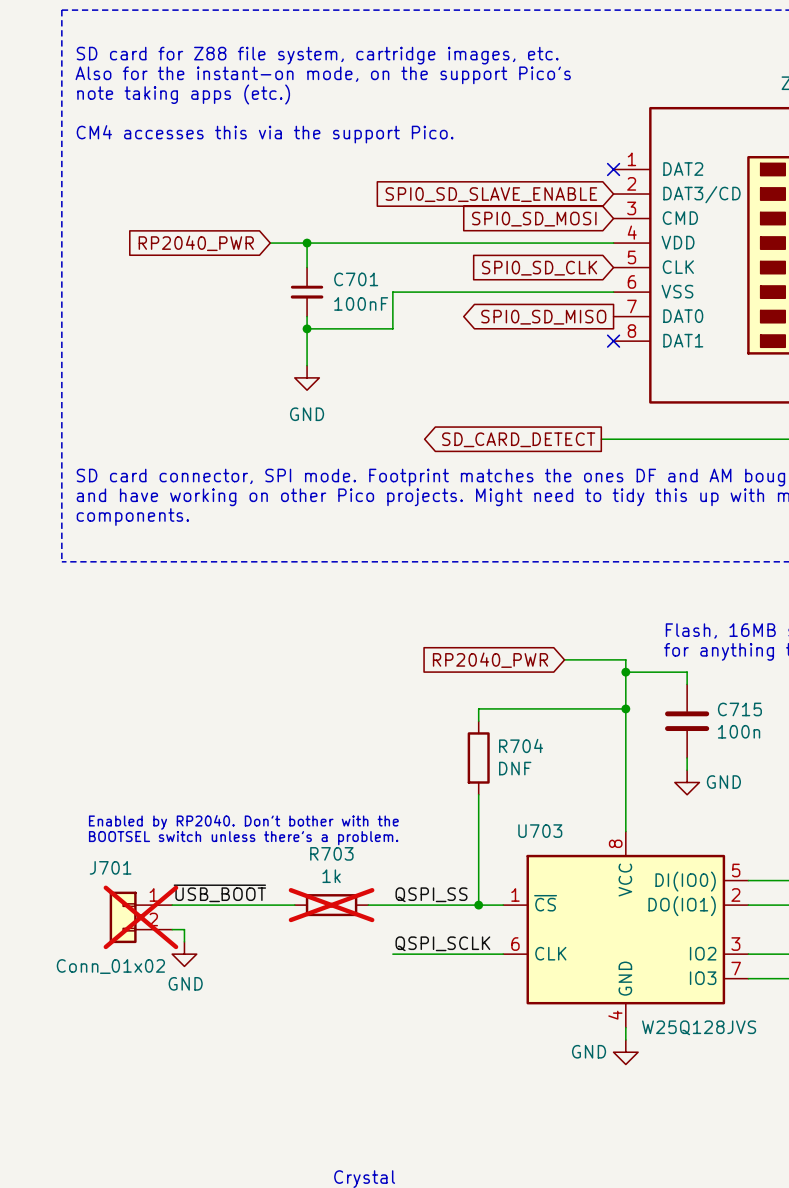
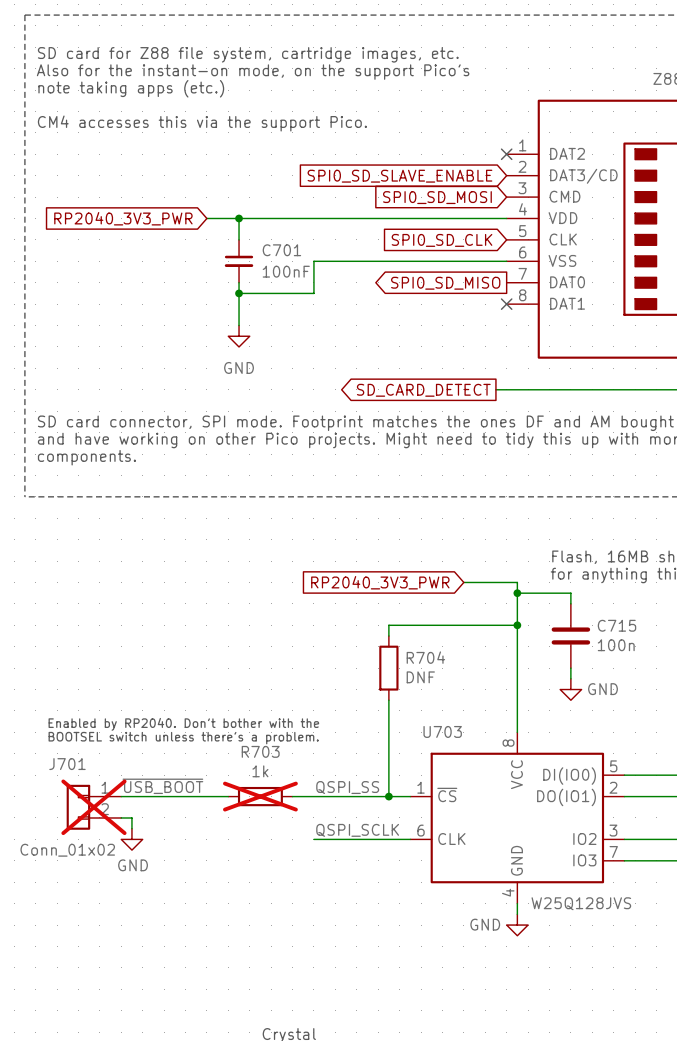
global label: RP2040_PWR (196, 243) -> RP2040_3V3_PWR (123, 218)
global label: RP2040_PWR (490, 660) -> RP2040_3V3_PWR (380, 582)

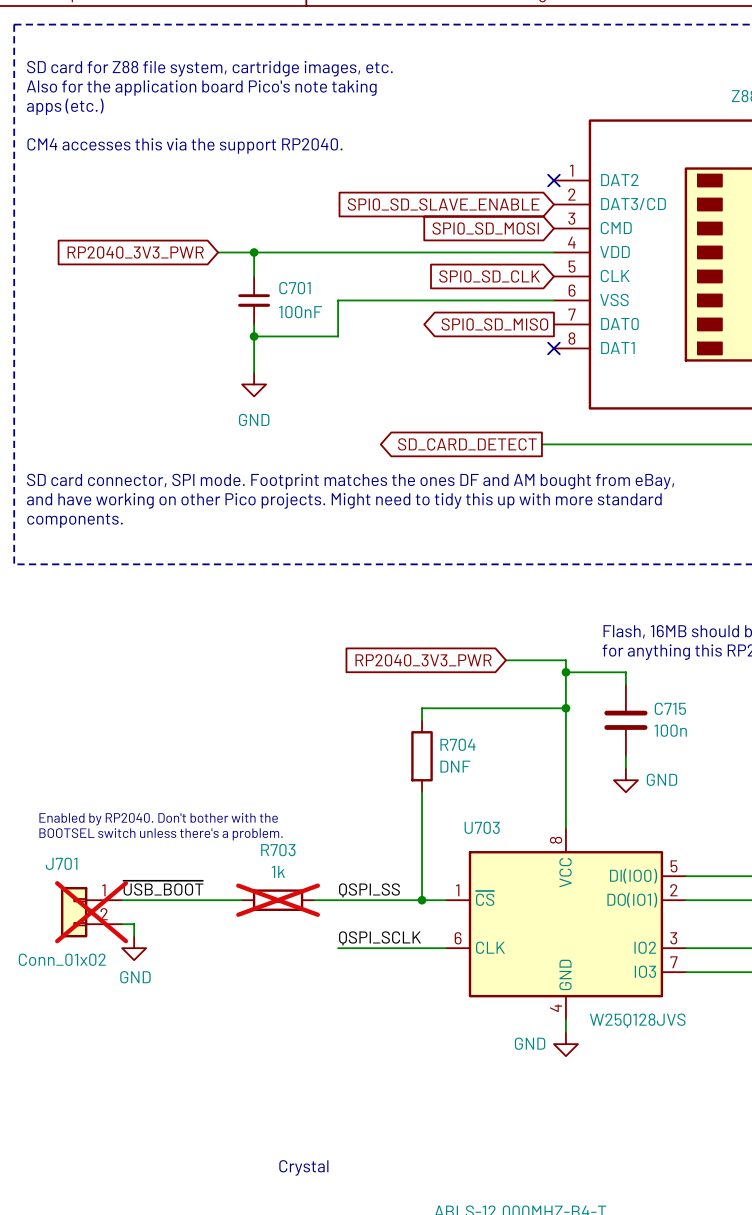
text: Also for the instant-on mode, on the support Pico's (253, 72) -> Also for the application board Pico's note taking (201, 88)
text: note taking apps (etc.) (131, 88) -> apps (etc.) (65, 106)
text: CM4 accesses this via the support Pico. (202, 123) -> CM4 accesses this via the support RP2040. (184, 145)

